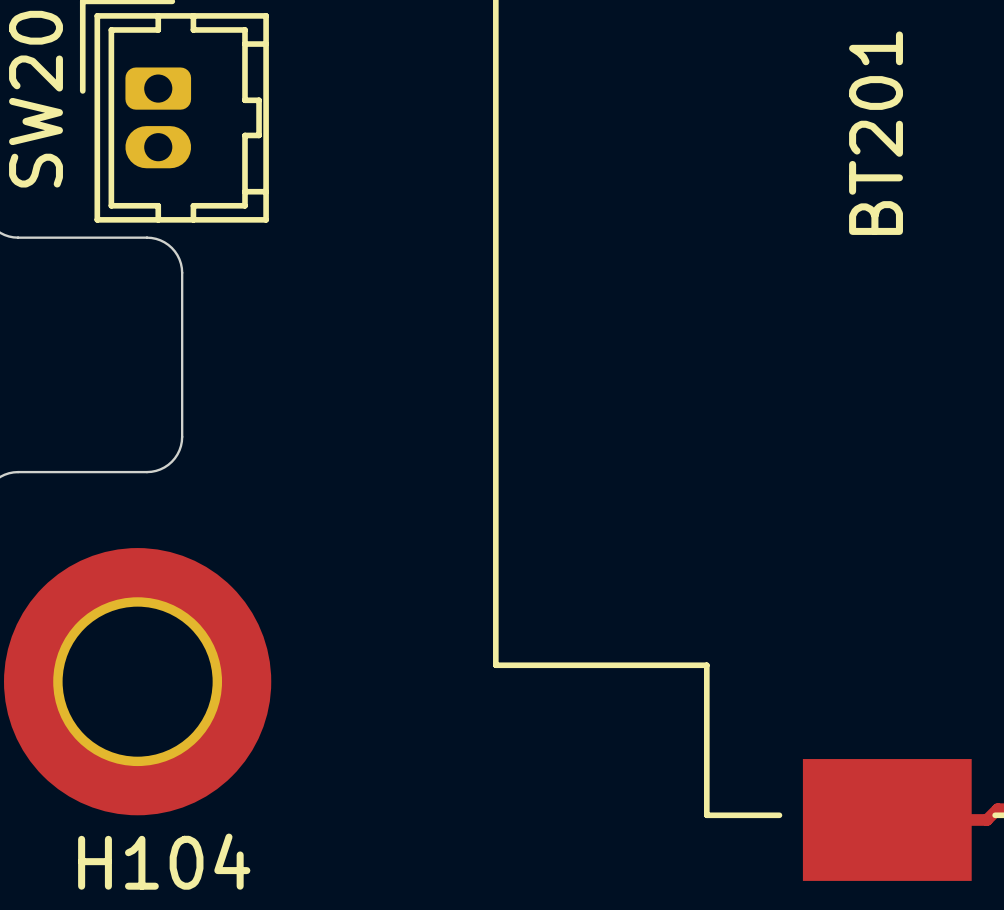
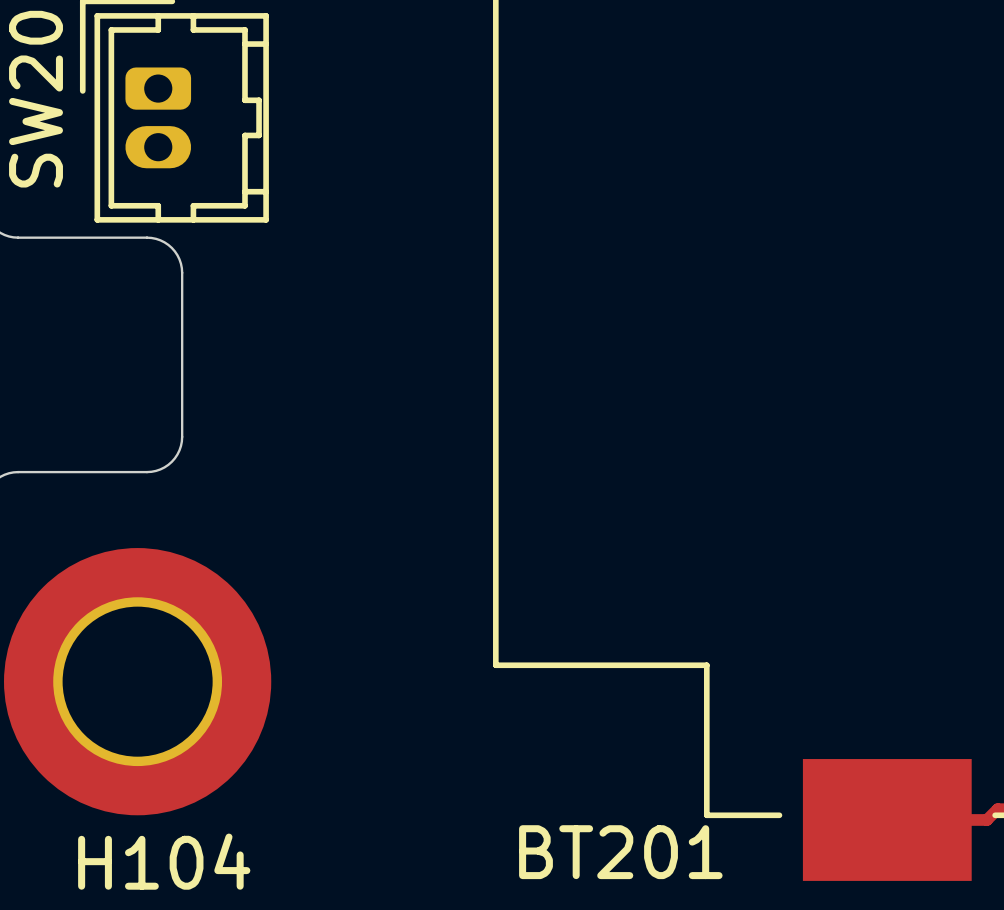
BT201 name rotation: 0° (876, 133) -> 90° clockwise (620, 852)
BT201 name position: BT201 (876, 133) -> BT201 (620, 852)

